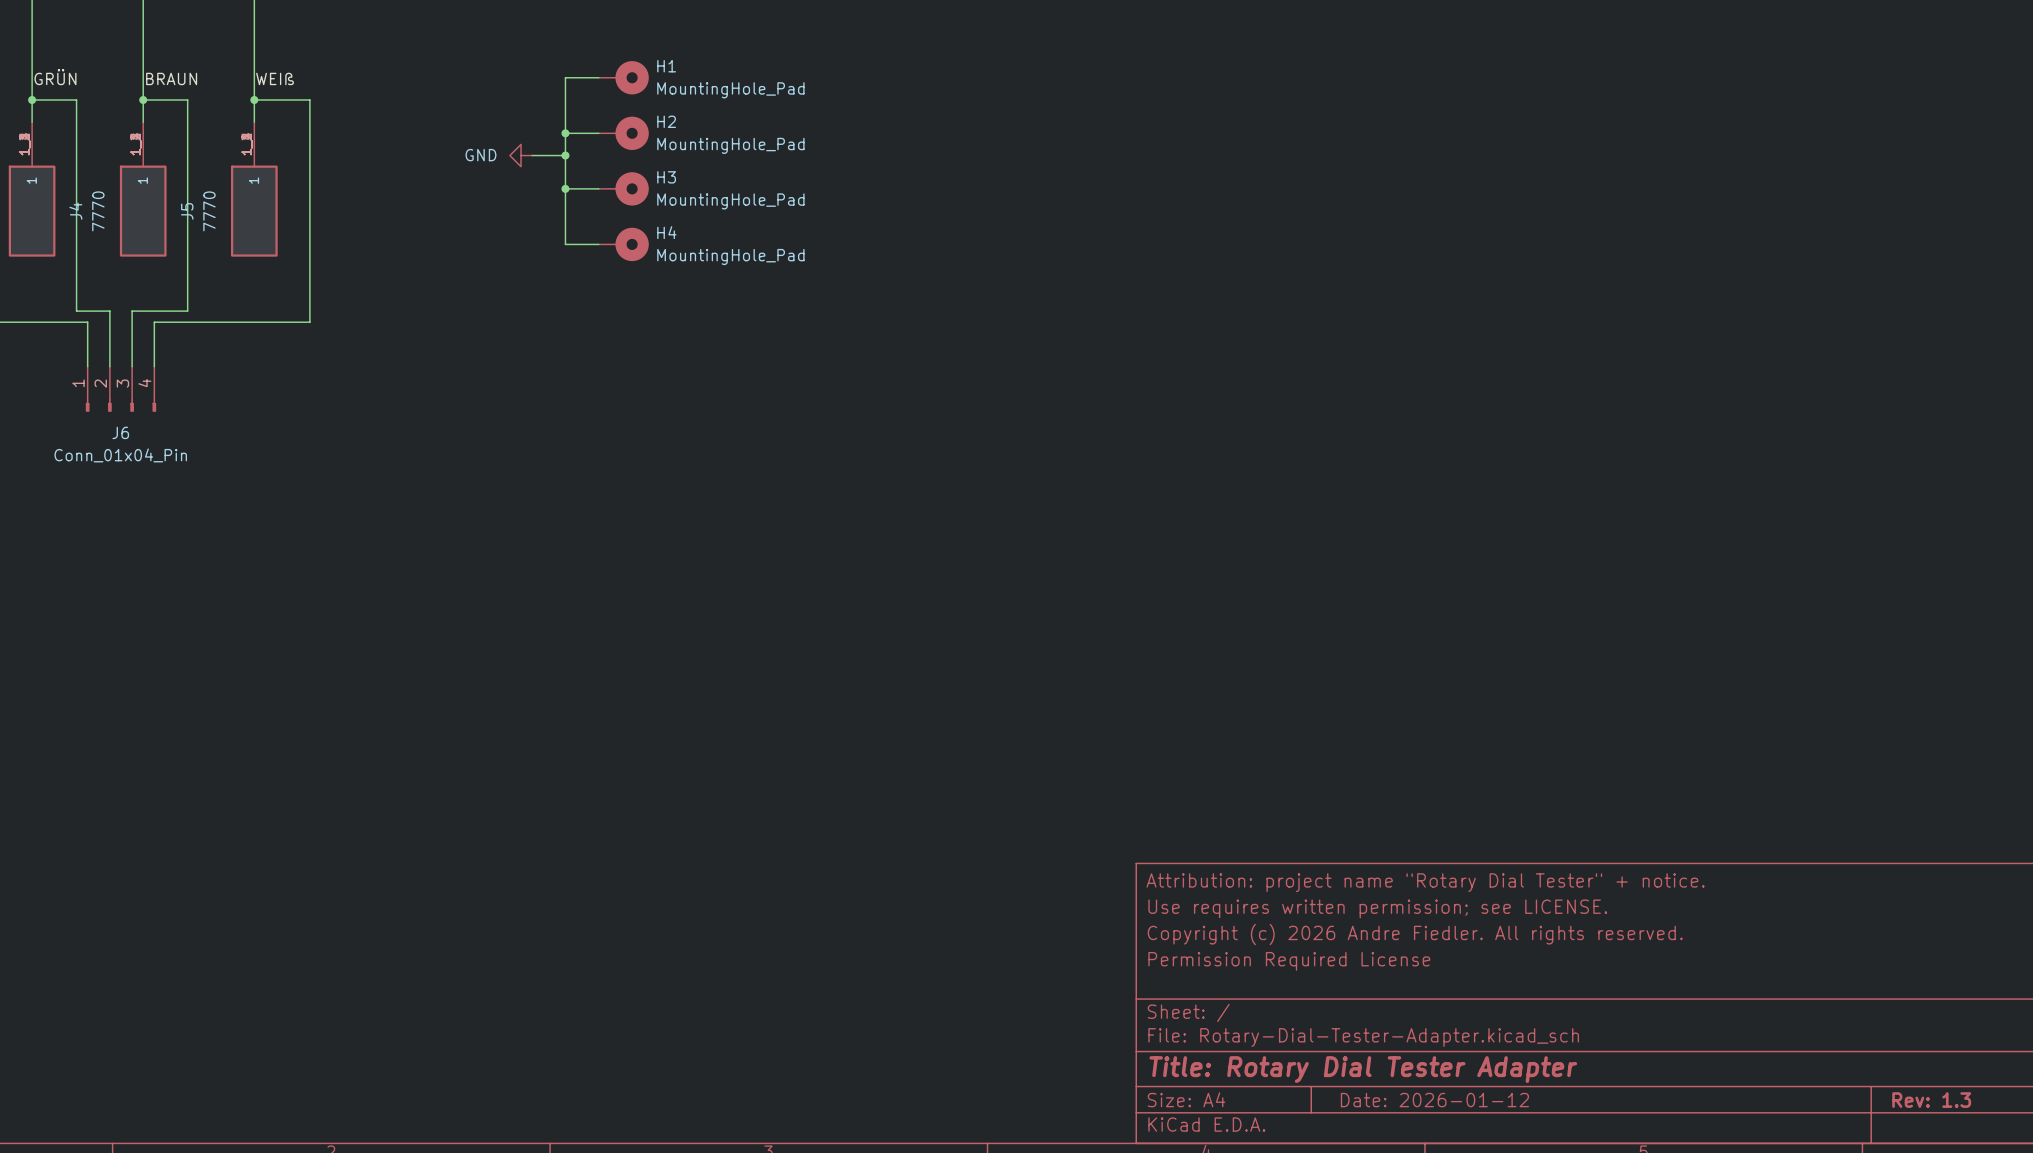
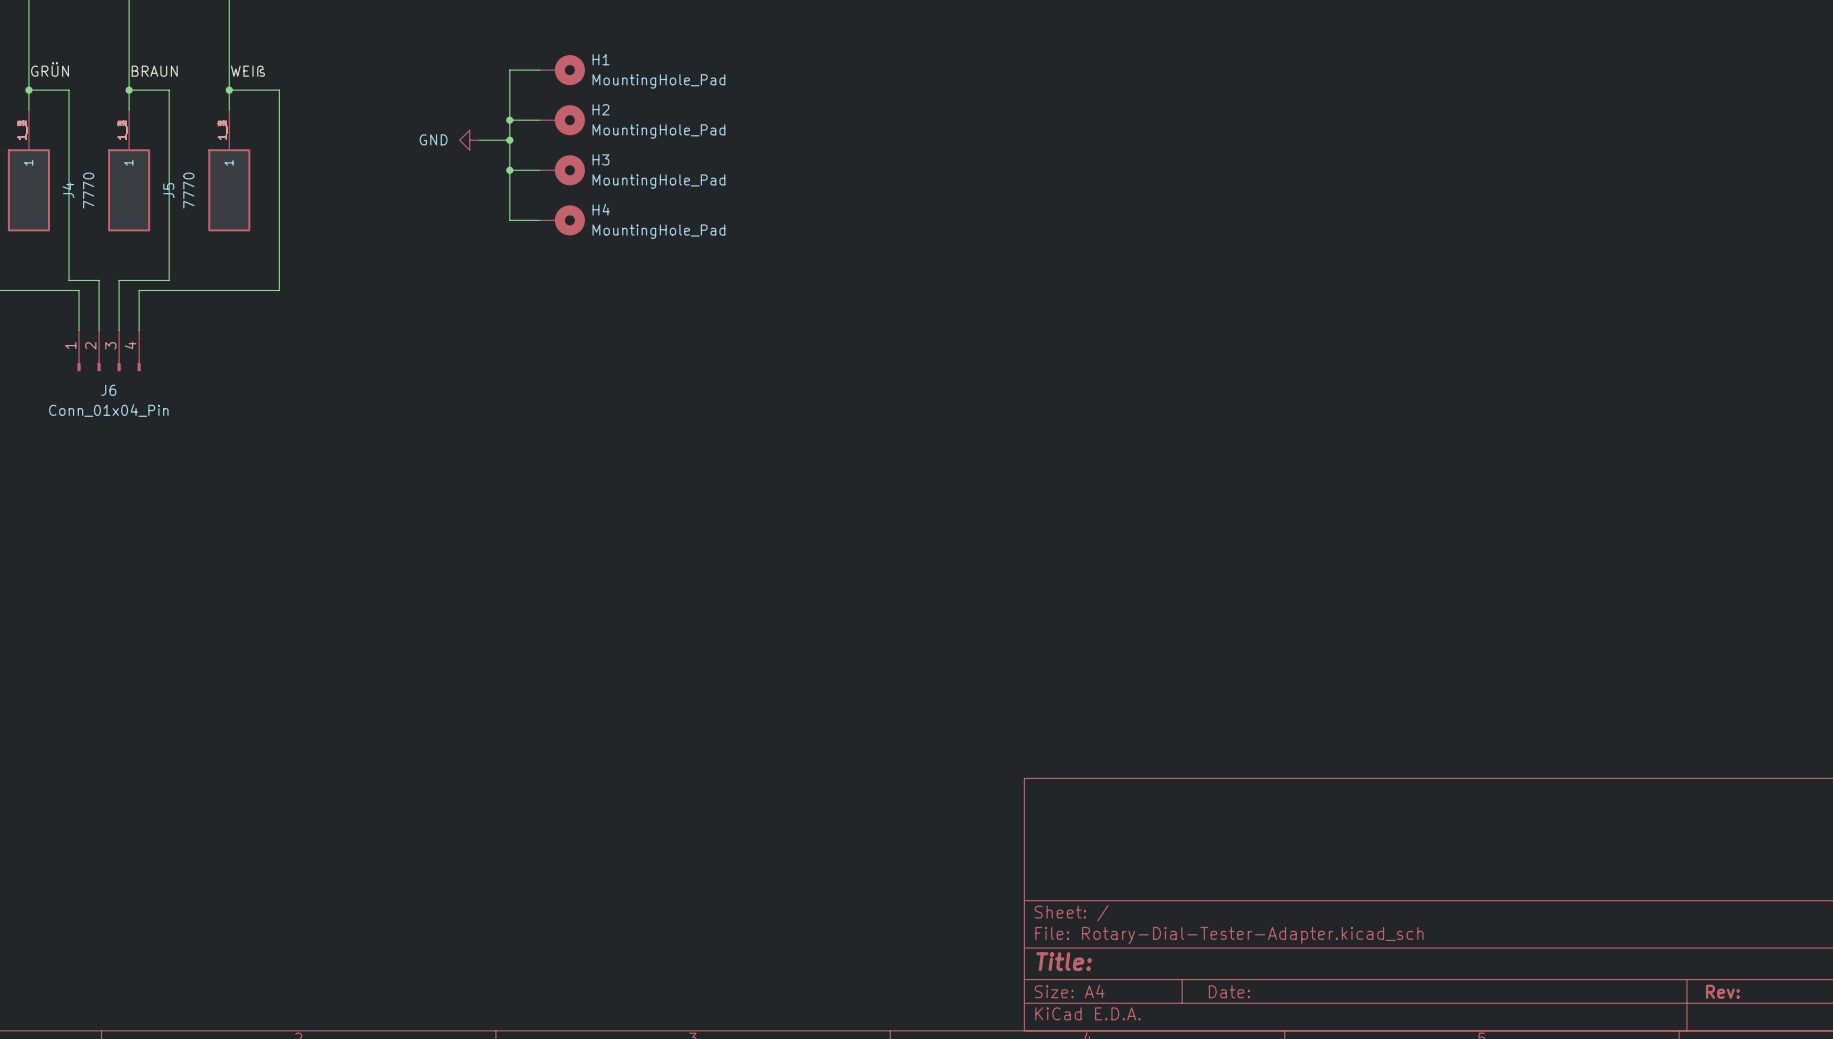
title block: Attribution: project name "Rotary Dial Tester" + notice. (1425, 882) -> none
title block: Use requires written permission; see LICENSE. (1377, 908) -> none
title block: Copyright (c) 2026 Andre Fiedler. All rights reserved. (1415, 934) -> none
title block: Permission Required License (1289, 961) -> none
title block: Title: Rotary Dial Tester Adapter (1363, 1069) -> Title: (1064, 961)
title block: Date: 2026-01-12 (1434, 1100) -> Date: (1229, 991)
title block: Rev: 1.3 (1931, 1100) -> Rev: (1722, 991)

